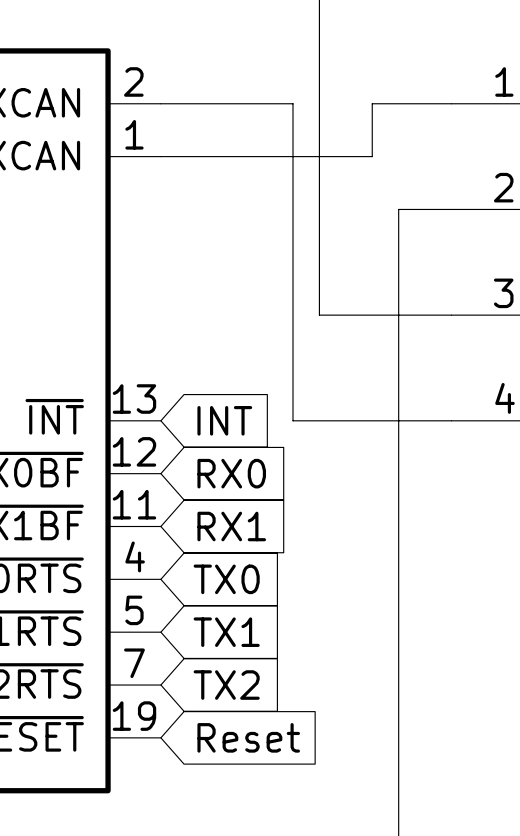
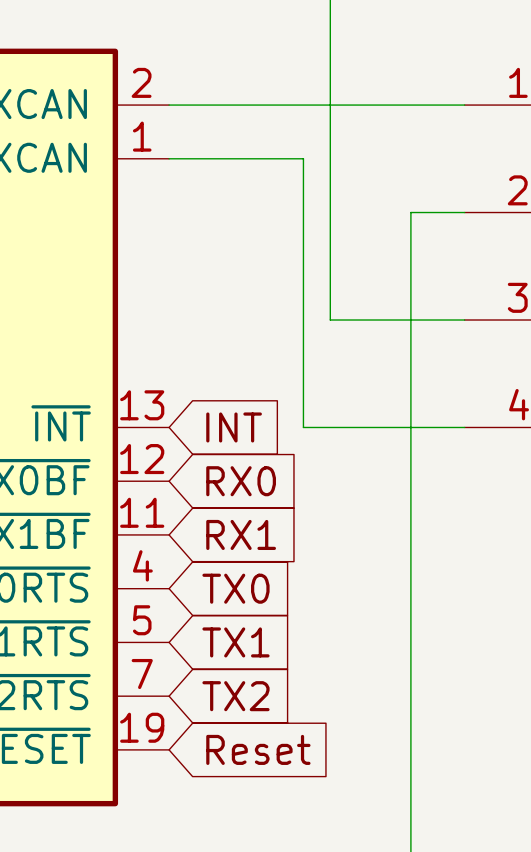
wire: (293, 103) (293, 156) (372, 156) (372, 103) -> (303, 105) (384, 105)

